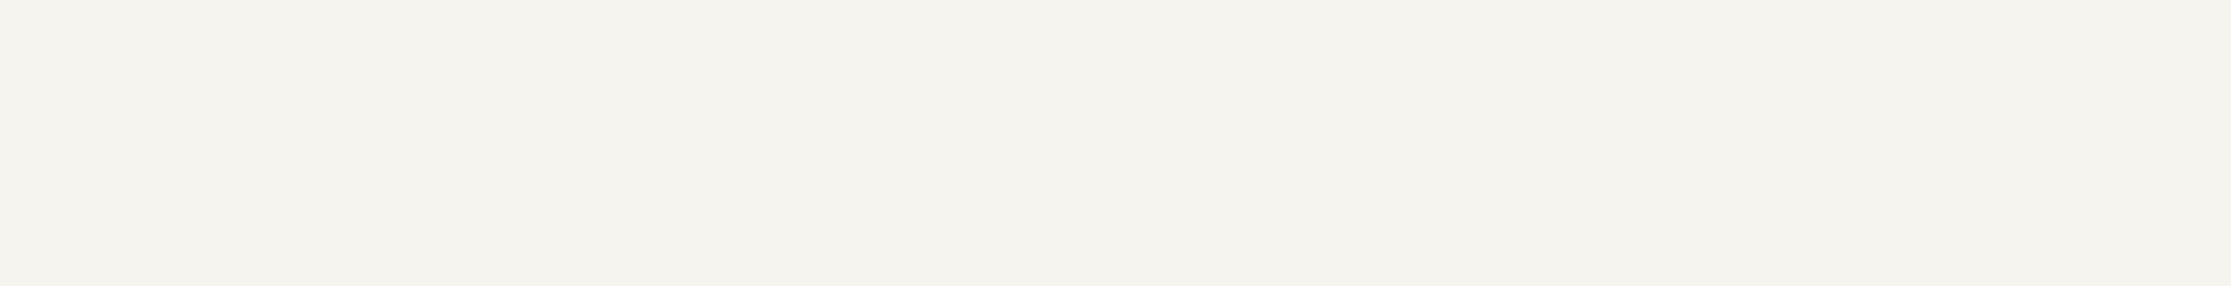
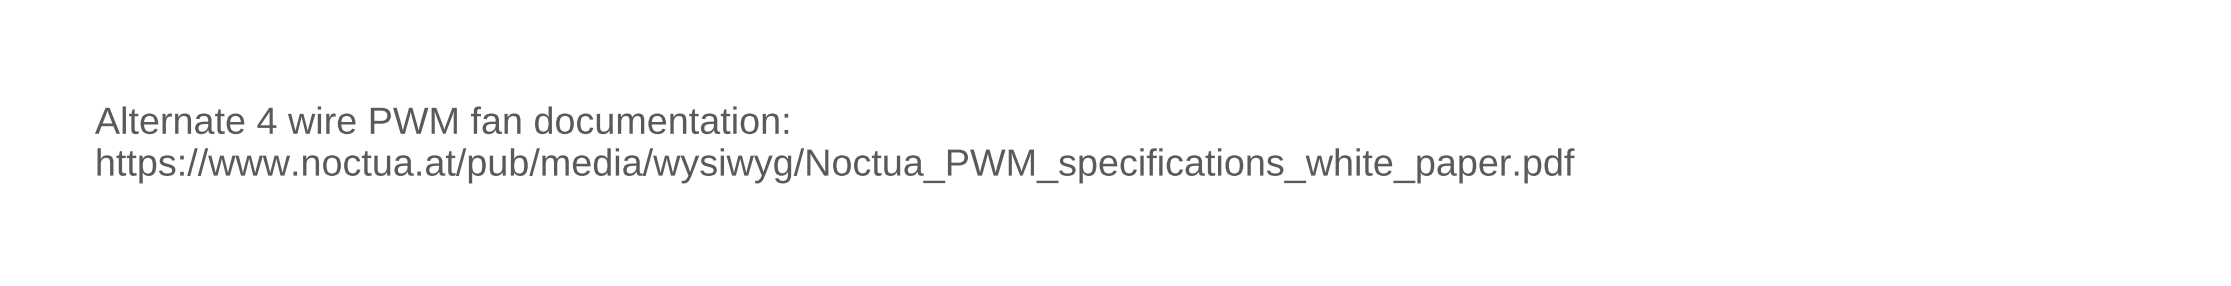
text: none -> Alternate 4 wire PWM fan documentation: (441, 120)
text: none -> https://www.noctua.at/pub/media/wysiwyg/Noctua_PWM_specifications_white_paper.pdf (835, 165)

